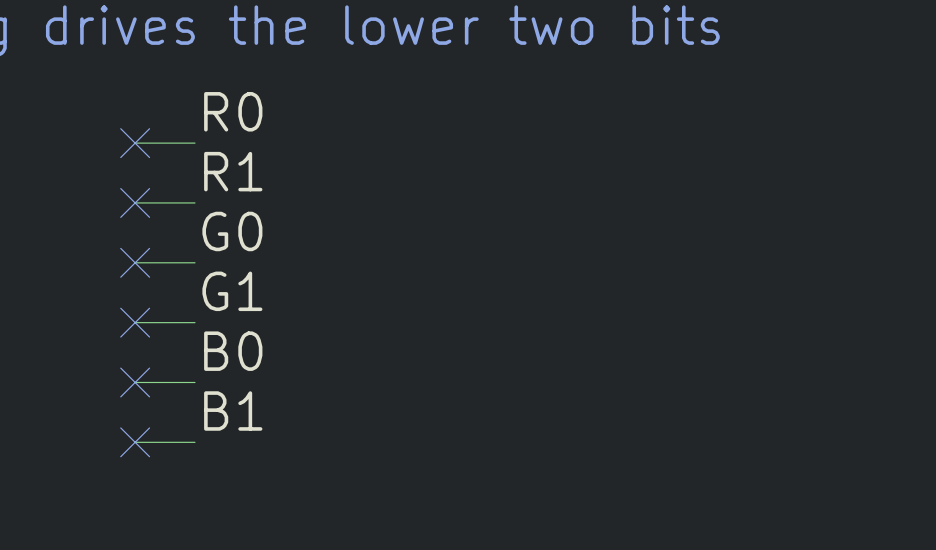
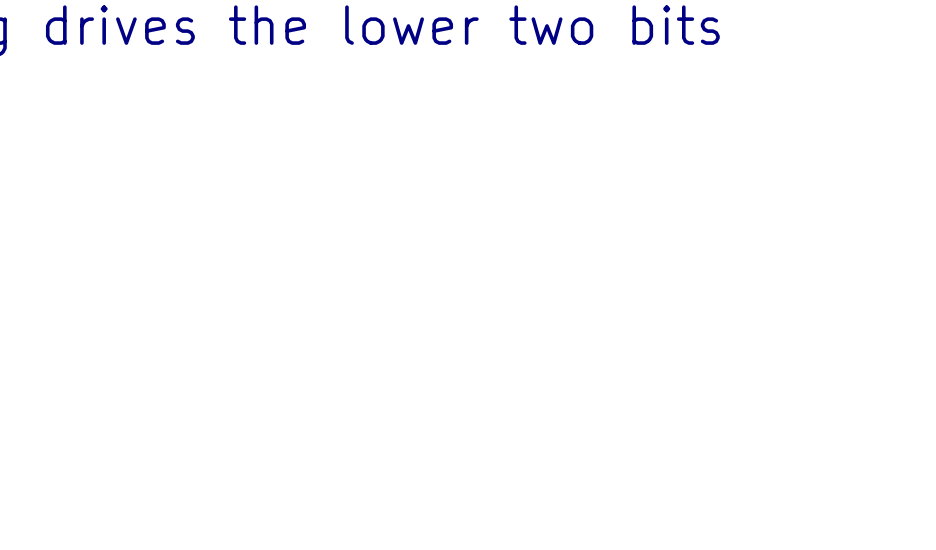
label: R0 (233, 111) -> none
wire: (135, 143) (194, 143) -> none
no-connect mark: (135, 143) -> none
label: R1 (233, 171) -> none
wire: (135, 202) (194, 202) -> none
no-connect mark: (135, 202) -> none
label: G0 (232, 231) -> none
wire: (135, 262) (194, 262) -> none
no-connect mark: (135, 262) -> none
label: G1 (232, 291) -> none
wire: (135, 322) (194, 322) -> none
no-connect mark: (135, 322) -> none
label: B0 (233, 351) -> none
wire: (135, 382) (194, 382) -> none
no-connect mark: (135, 382) -> none
label: B1 (233, 411) -> none
wire: (135, 442) (194, 442) -> none
no-connect mark: (135, 442) -> none

